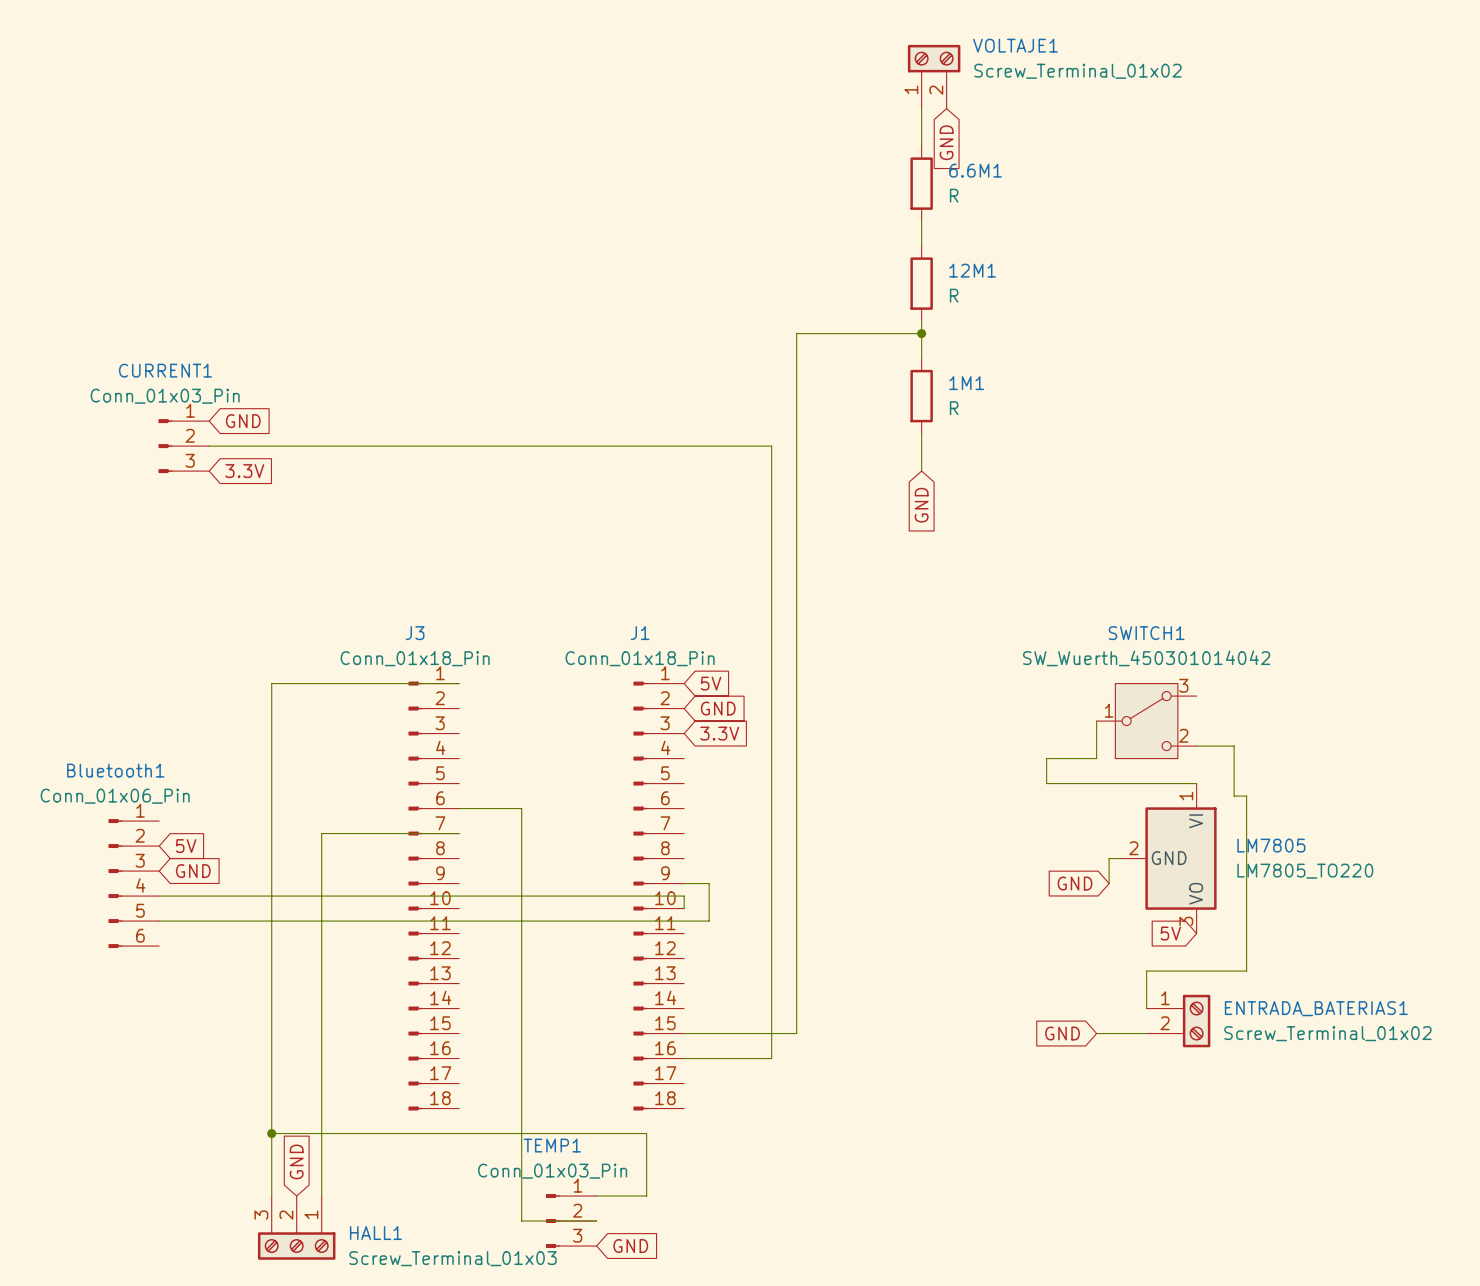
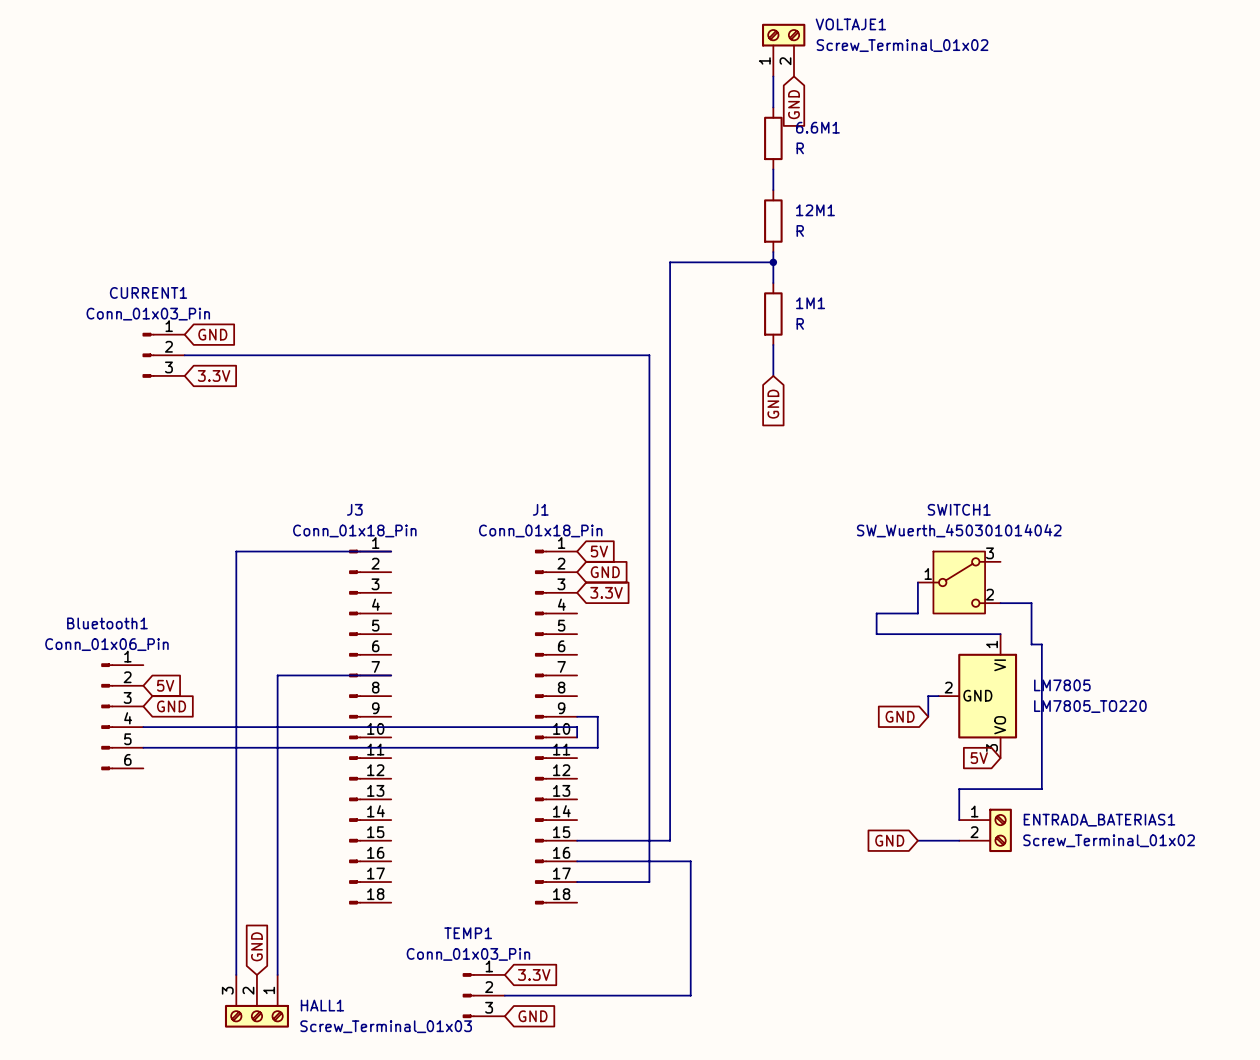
wire: (459, 808) (521, 808) (521, 1221) (596, 1221) -> (577, 882) (649, 882) (649, 861) (690, 861) (690, 995) (504, 995)
wire: (271, 1133) (646, 1133) (646, 1196) (596, 1196) -> none
junction: (271, 1133) -> none
global label: none -> 3.3V (534, 974)

